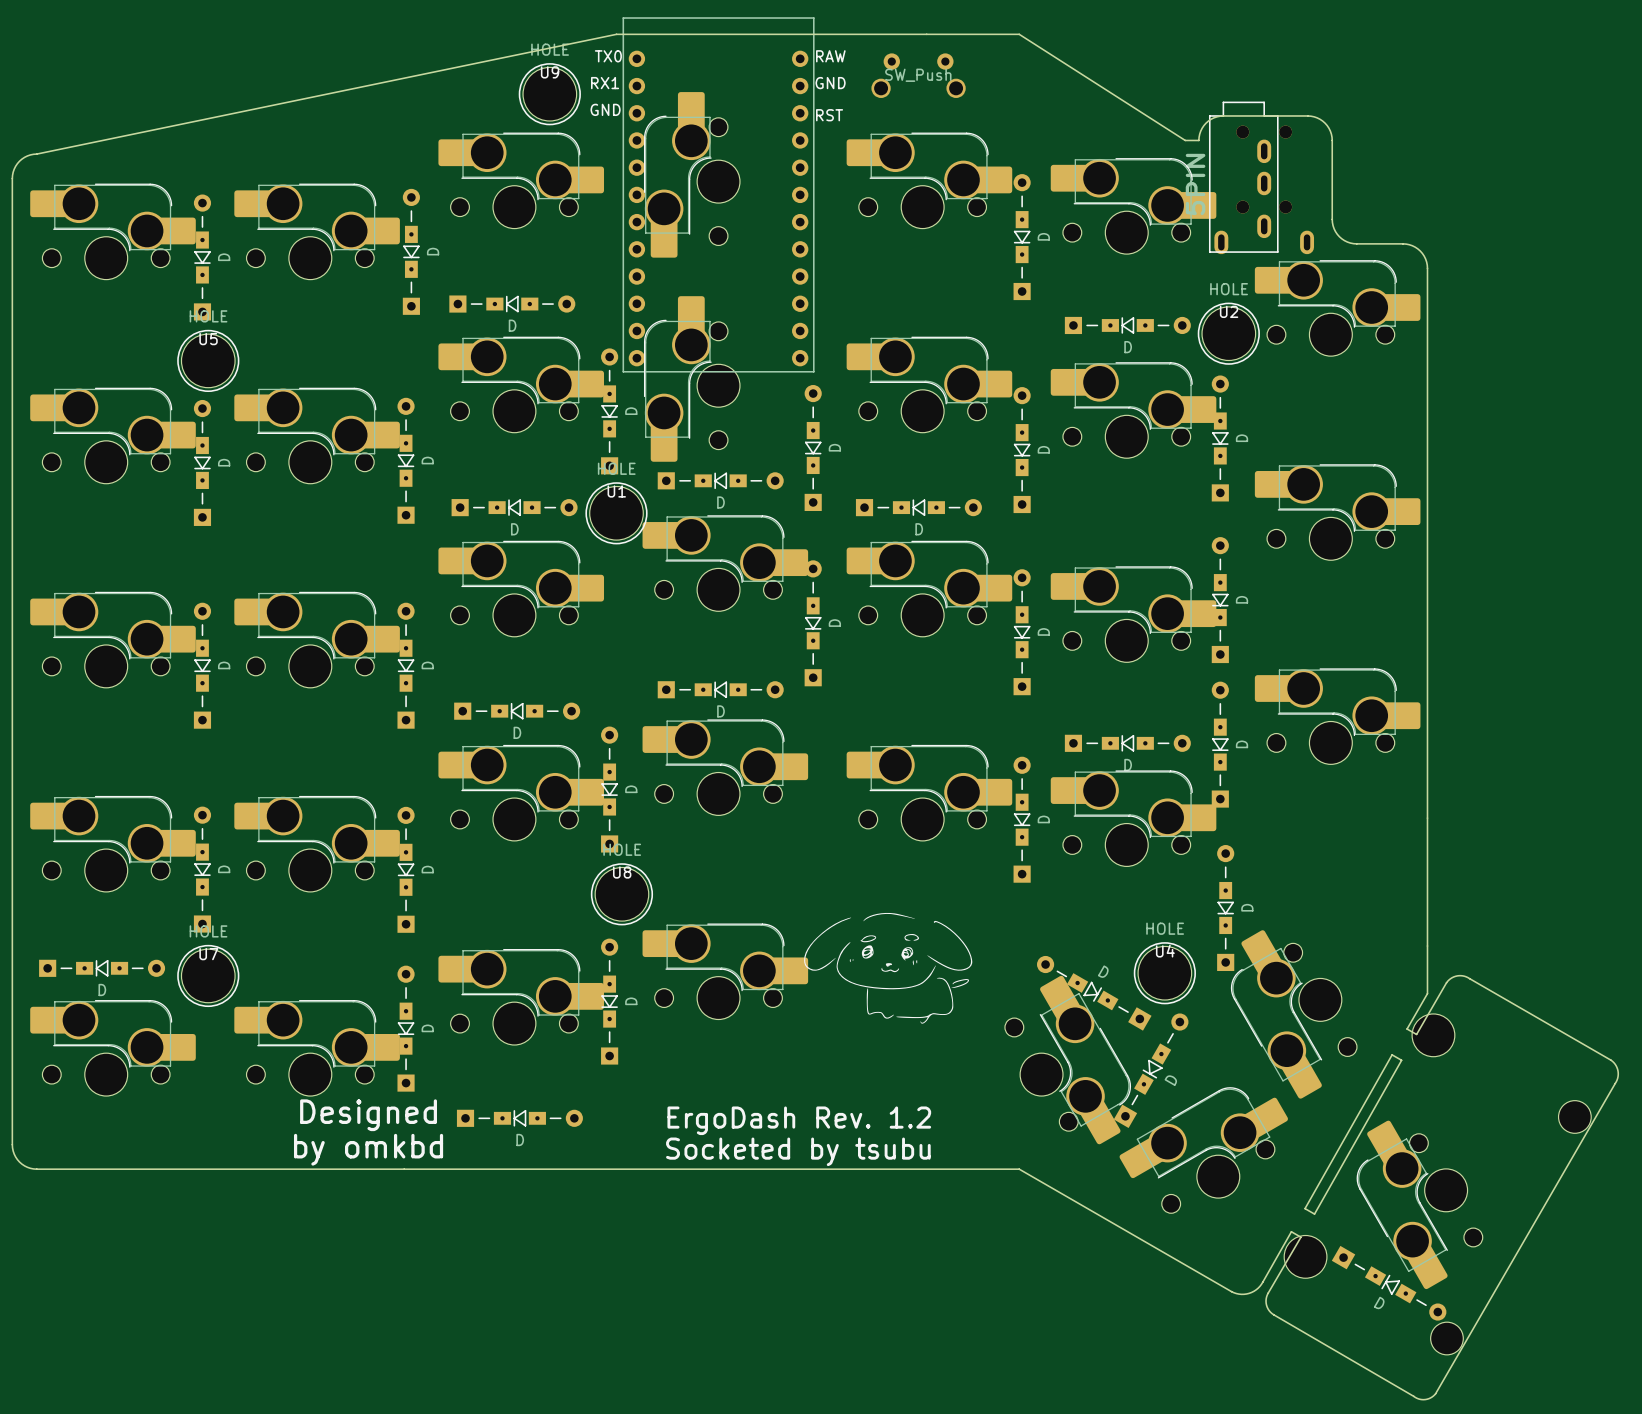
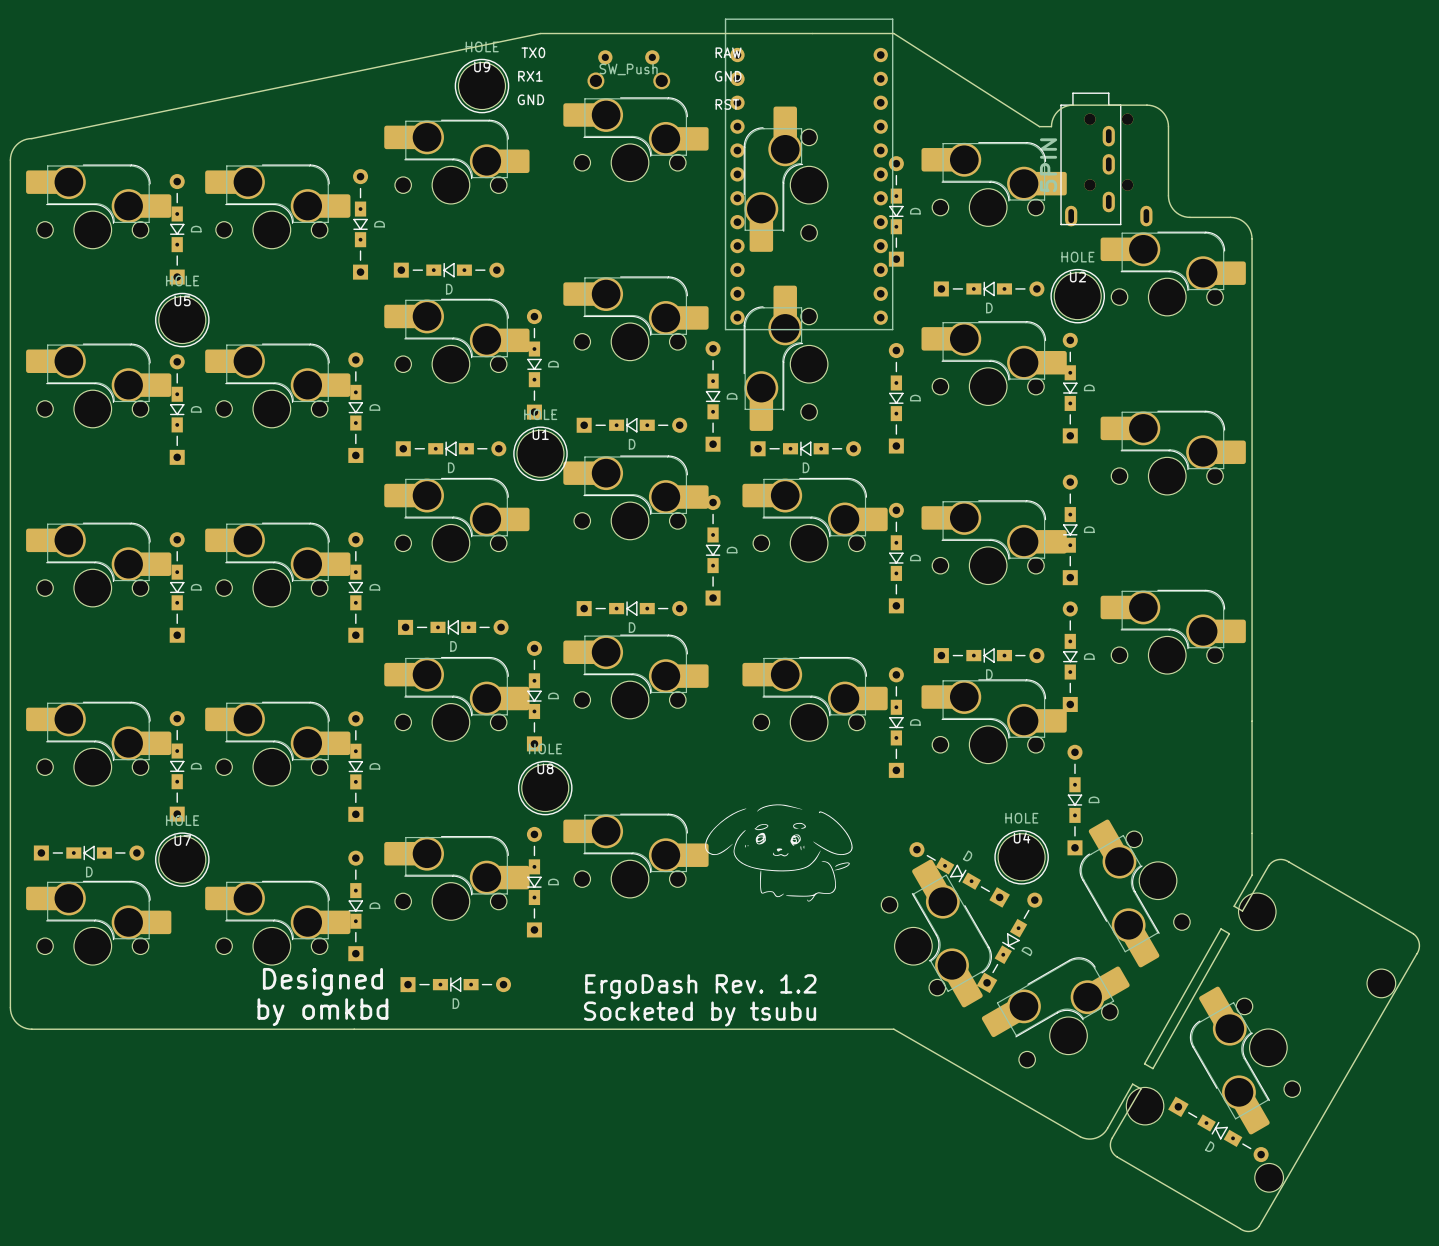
part position: (918, 75) -> (628, 69)
part rotation: 0° (691, 174) -> 90° clockwise (635, 139)
part rotation: 0° (929, 180) -> 90° counterclockwise (785, 179)
part position: (718, 194) -> (809, 174)
part rotation: 0° (691, 378) -> 90° clockwise (635, 318)
part rotation: 0° (929, 384) -> 90° counterclockwise (785, 358)

